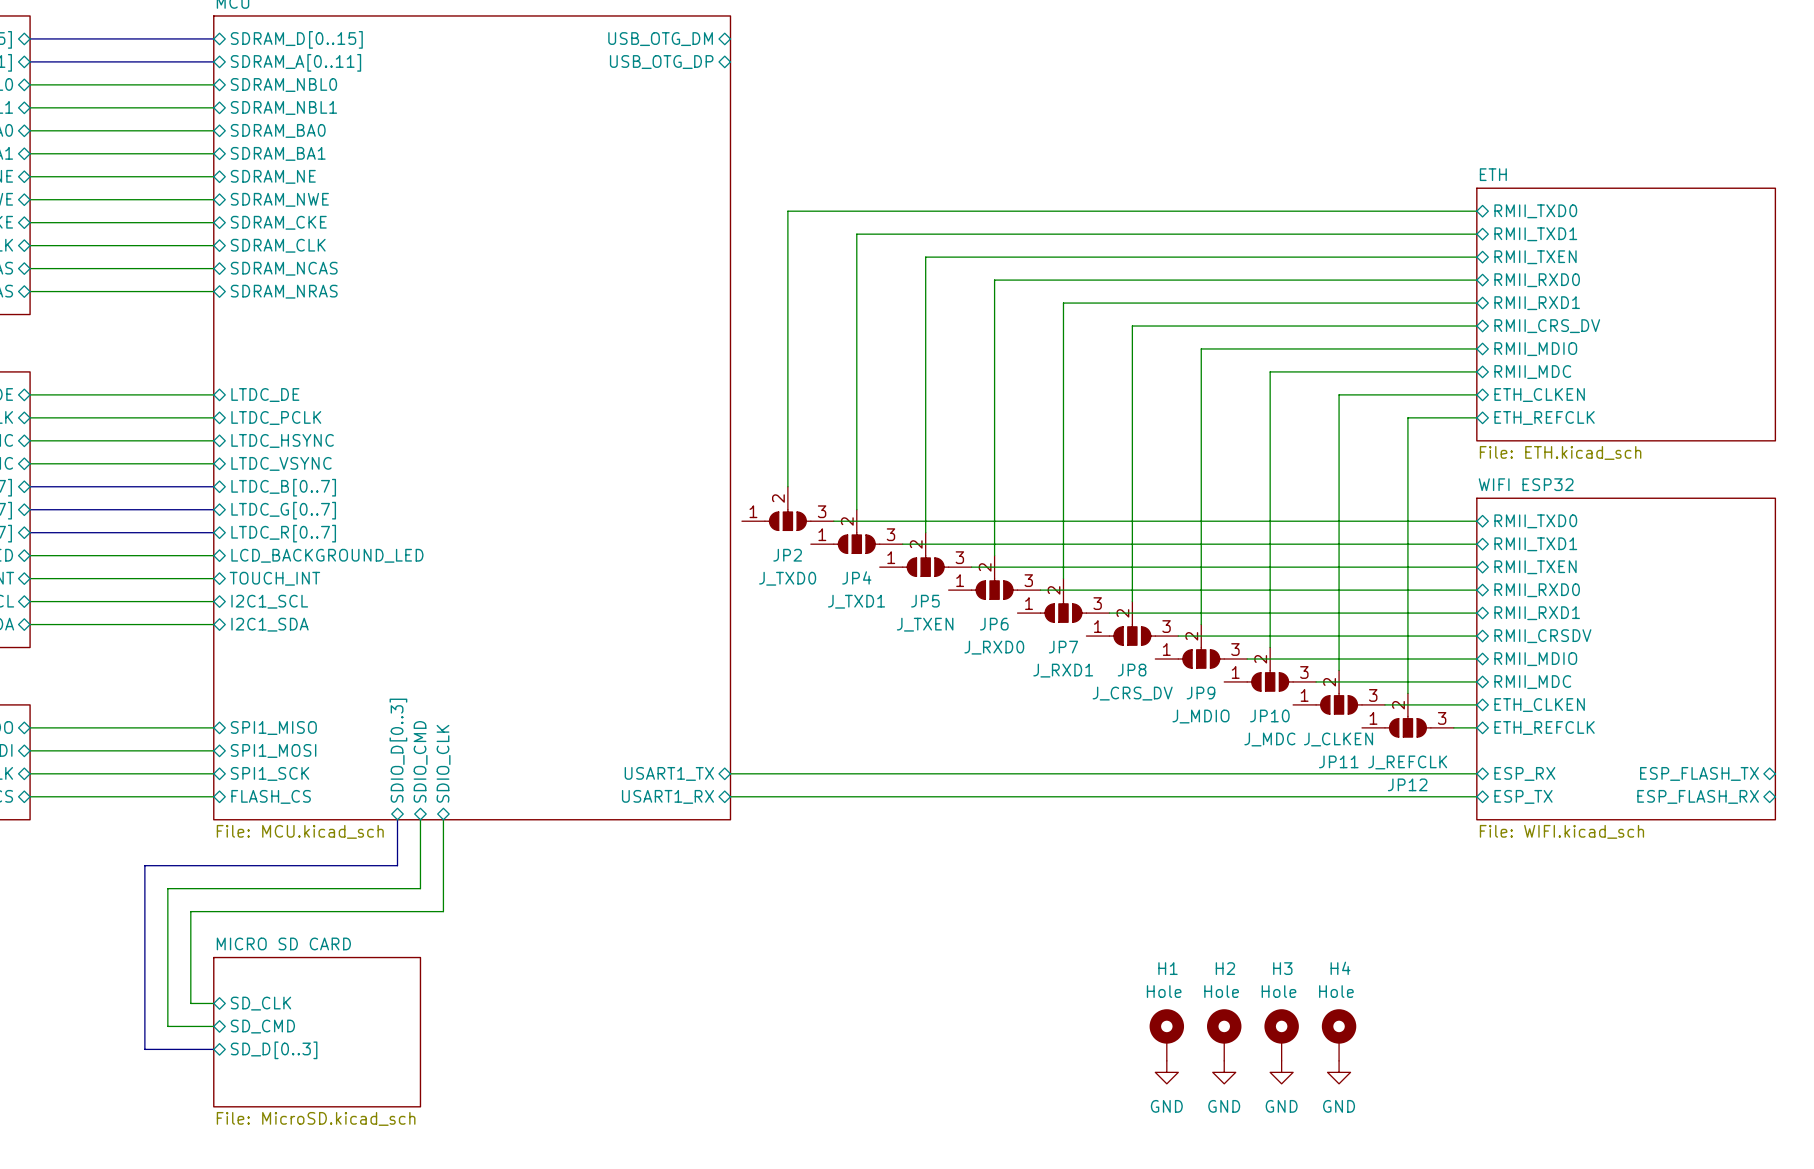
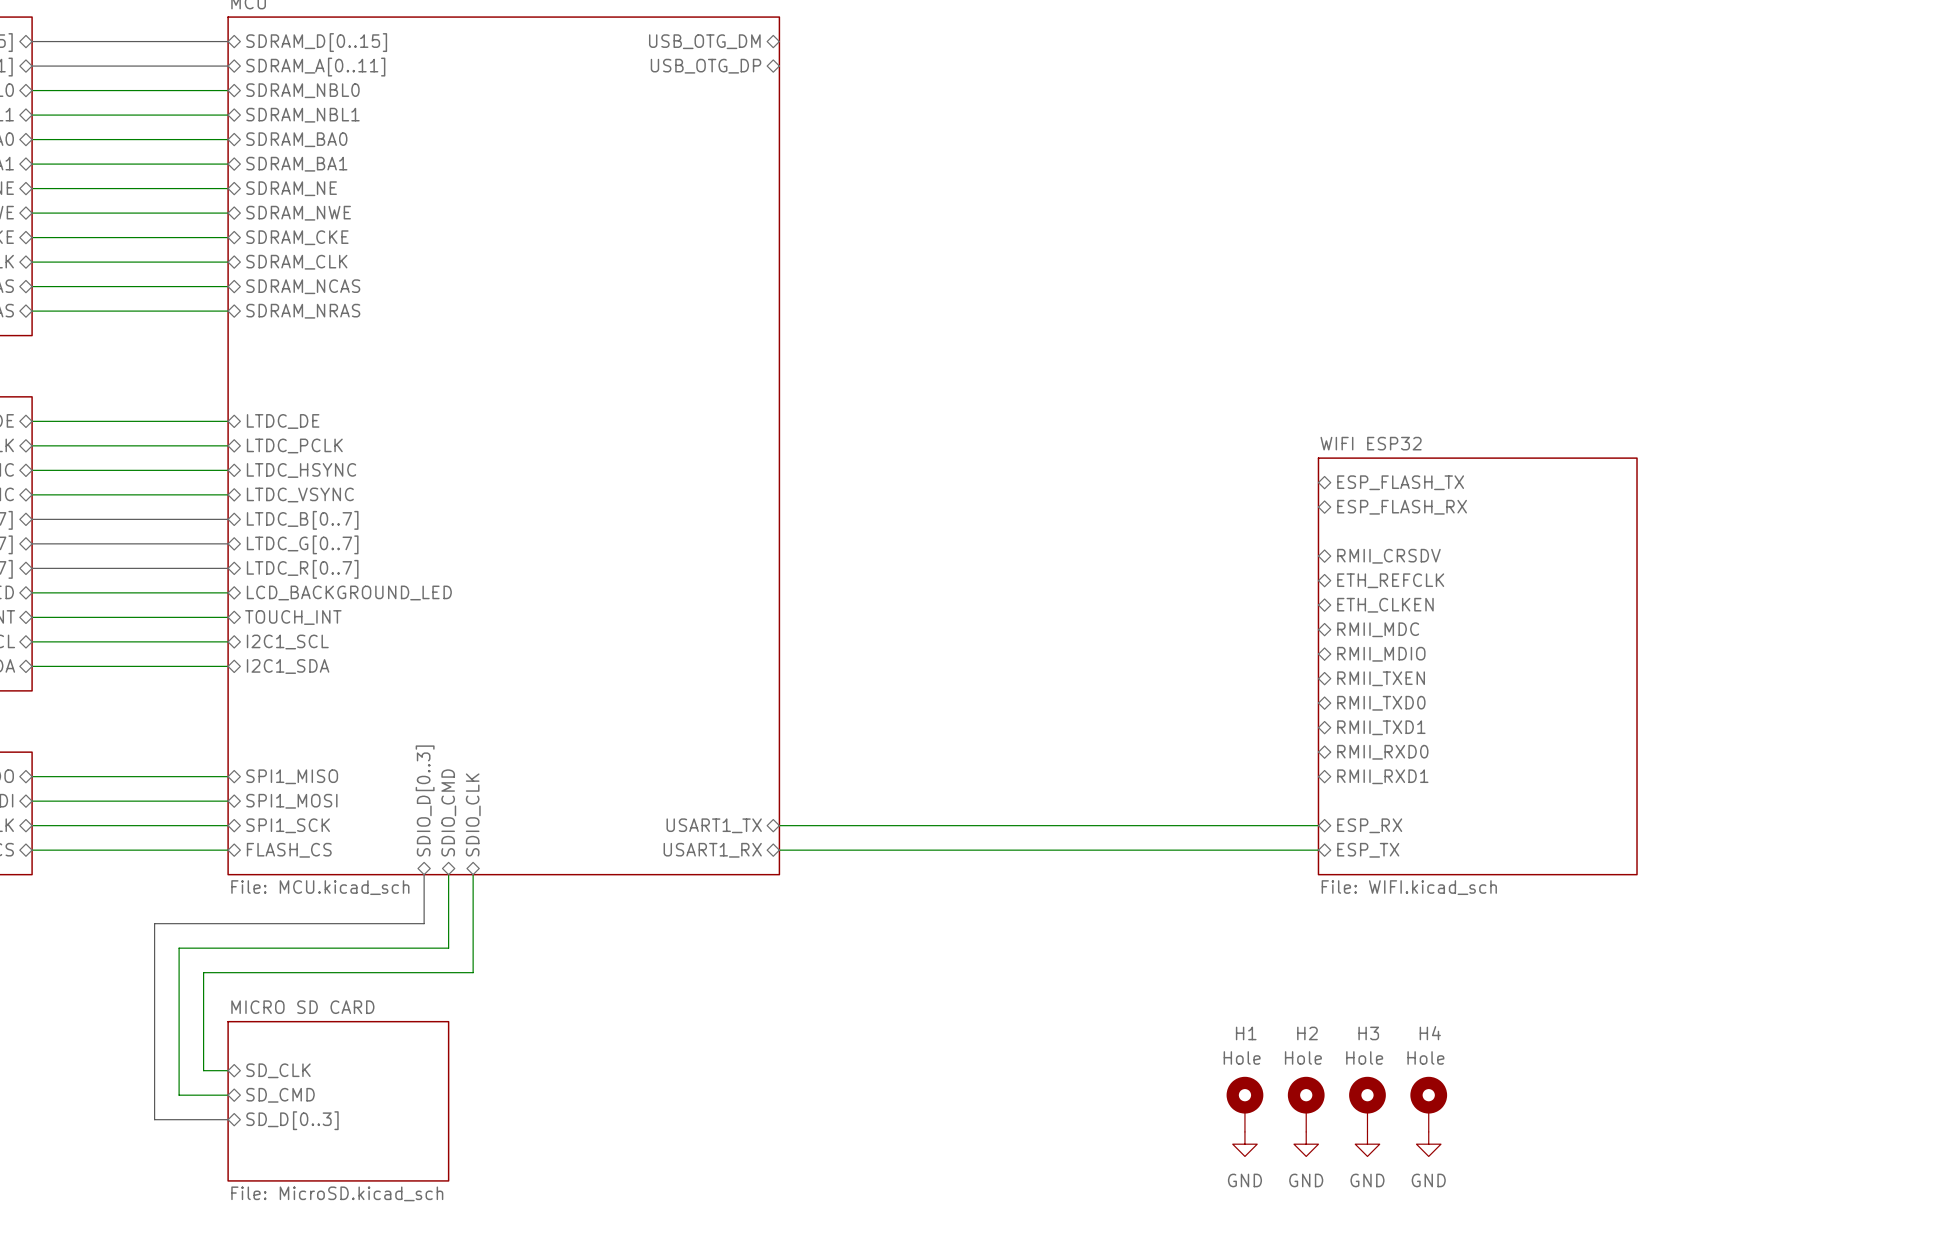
wire: (1476, 211) (787, 211) (787, 486) -> none
sheet pin: RMII_TXD0 (1535, 211) -> none
wire: (1476, 234) (856, 234) (856, 509) -> none
sheet pin: RMII_TXD1 (1535, 234) -> none
wire: (1476, 257) (925, 257) (925, 532) -> none
sheet pin: RMII_TXEN (1535, 257) -> none
wire: (1476, 280) (994, 280) (994, 555) -> none
sheet pin: RMII_RXD0 (1537, 280) -> none
wire: (1476, 303) (1063, 303) (1063, 578) -> none
sheet pin: RMII_RXD1 (1537, 303) -> none
sheet ETH: File: ETH.kicad_sch (1626, 314) -> none
wire: (1476, 326) (1132, 326) (1132, 601) -> none
sheet pin: RMII_CRS_DV (1547, 326) -> none
wire: (1476, 348) (1201, 348) (1201, 624) -> none
sheet pin: RMII_MDIO (1535, 349) -> none
wire: (1476, 371) (1270, 371) (1270, 647) -> none
sheet pin: RMII_MDC (1532, 372) -> none
wire: (1476, 394) (1339, 394) (1339, 670) -> none
sheet pin: ETH_CLKEN (1539, 395) -> none
wire: (1476, 417) (1407, 417) (1407, 693) -> none
sheet pin: ETH_REFCLK (1544, 417) -> none
sheet pin: none -> ESP_FLASH_TX (1400, 482)
sheet pin: none -> ESP_FLASH_RX (1402, 507)
sheet WIFI ESP32 name position: WIFI ESP32 (1526, 484) -> WIFI ESP32 (1371, 443)
sheet WIFI ESP32 shape: [1476, 497, 1777, 821] -> [1317, 457, 1638, 876]
JP2: J_TXD0 (787, 508) -> none
wire: (833, 521) (1476, 521) -> none
sheet pin: none -> RMII_CRSDV (1388, 556)
sheet pin: RMII_TXD0 (1535, 521) -> none
JP4: J_TXD1 (856, 531) -> none
wire: (902, 544) (1476, 544) -> none
sheet pin: none -> ETH_REFCLK (1390, 580)
sheet pin: RMII_TXD1 (1535, 544) -> none
JP5: J_TXEN (925, 554) -> none
wire: (971, 567) (1476, 567) -> none
sheet pin: none -> ETH_CLKEN (1385, 605)
sheet pin: RMII_TXEN (1535, 567) -> none
JP6: J_RXD0 (994, 577) -> none
wire: (1040, 590) (1476, 590) -> none
sheet pin: none -> RMII_MDC (1378, 629)
sheet pin: RMII_RXD0 (1537, 590) -> none
JP7: J_RXD1 (1063, 600) -> none
wire: (1109, 613) (1476, 613) -> none
sheet pin: none -> RMII_MDIO (1381, 654)
sheet pin: RMII_RXD1 (1537, 613) -> none
JP8: J_CRS_DV (1132, 623) -> none
wire: (1178, 636) (1476, 636) -> none
sheet pin: none -> RMII_TXEN (1381, 678)
sheet pin: RMII_CRSDV (1542, 636) -> none
JP9: J_MDIO (1201, 646) -> none
wire: (1247, 659) (1476, 659) -> none
sheet pin: none -> RMII_TXD0 (1381, 703)
sheet pin: RMII_MDIO (1535, 659) -> none
JP10: J_MDC (1270, 669) -> none
wire: (1316, 681) (1476, 681) -> none
sheet pin: none -> RMII_TXD1 (1381, 727)
sheet pin: RMII_MDC (1532, 682) -> none
JP11: J_CLKEN (1339, 692) -> none
wire: (1384, 704) (1476, 704) -> none
sheet pin: none -> RMII_RXD0 (1382, 752)
sheet pin: ETH_CLKEN (1539, 705) -> none
JP12: J_REFCLK (1407, 715) -> none
wire: (1453, 727) (1476, 727) -> none
sheet pin: none -> RMII_RXD1 (1382, 776)
sheet pin: ETH_REFCLK (1544, 728) -> none
wire: (1235, 773) (1476, 773) -> none
sheet pin: none -> ESP_RX (1369, 825)
sheet pin: ESP_RX (1524, 773) -> none
sheet pin: ESP_FLASH_TX (1699, 773) -> none
wire: (1235, 796) (1476, 796) -> none
sheet pin: none -> ESP_TX (1368, 850)
sheet pin: ESP_TX (1523, 796) -> none
sheet pin: ESP_FLASH_RX (1698, 796) -> none
sheet WIFI ESP32 value position: File: WIFI.kicad_sch (1561, 831) -> File: WIFI.kicad_sch (1409, 887)

